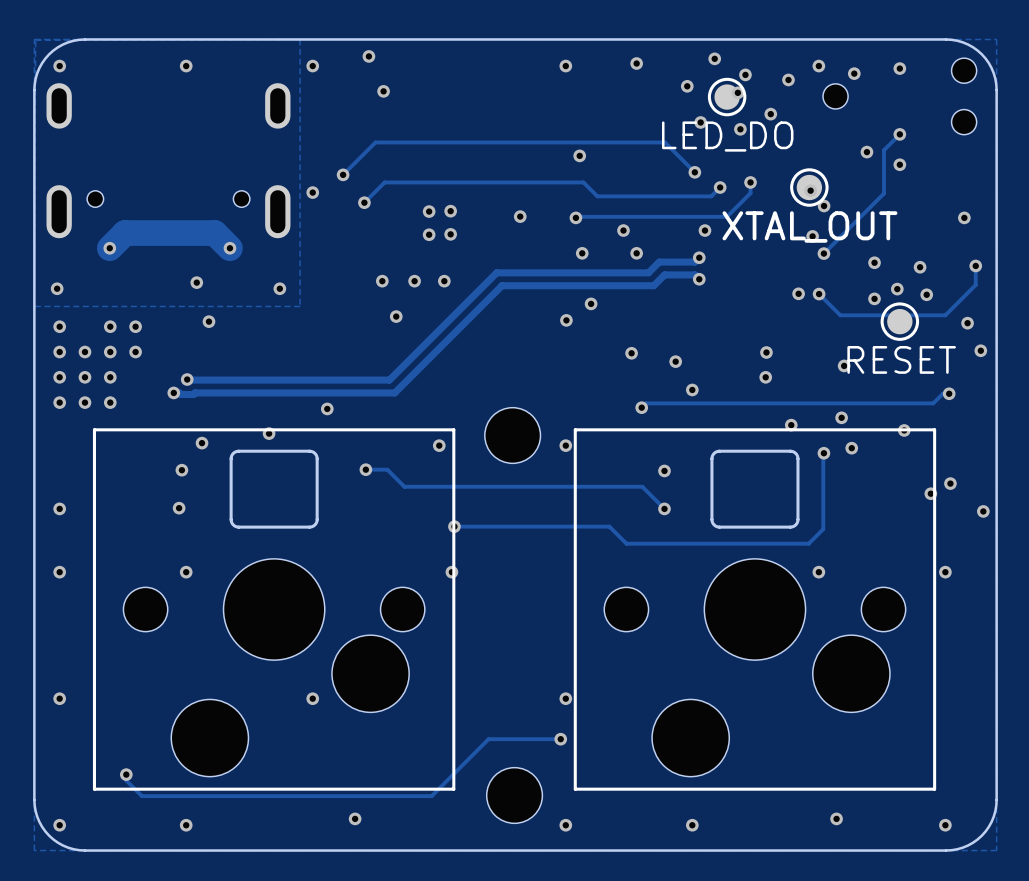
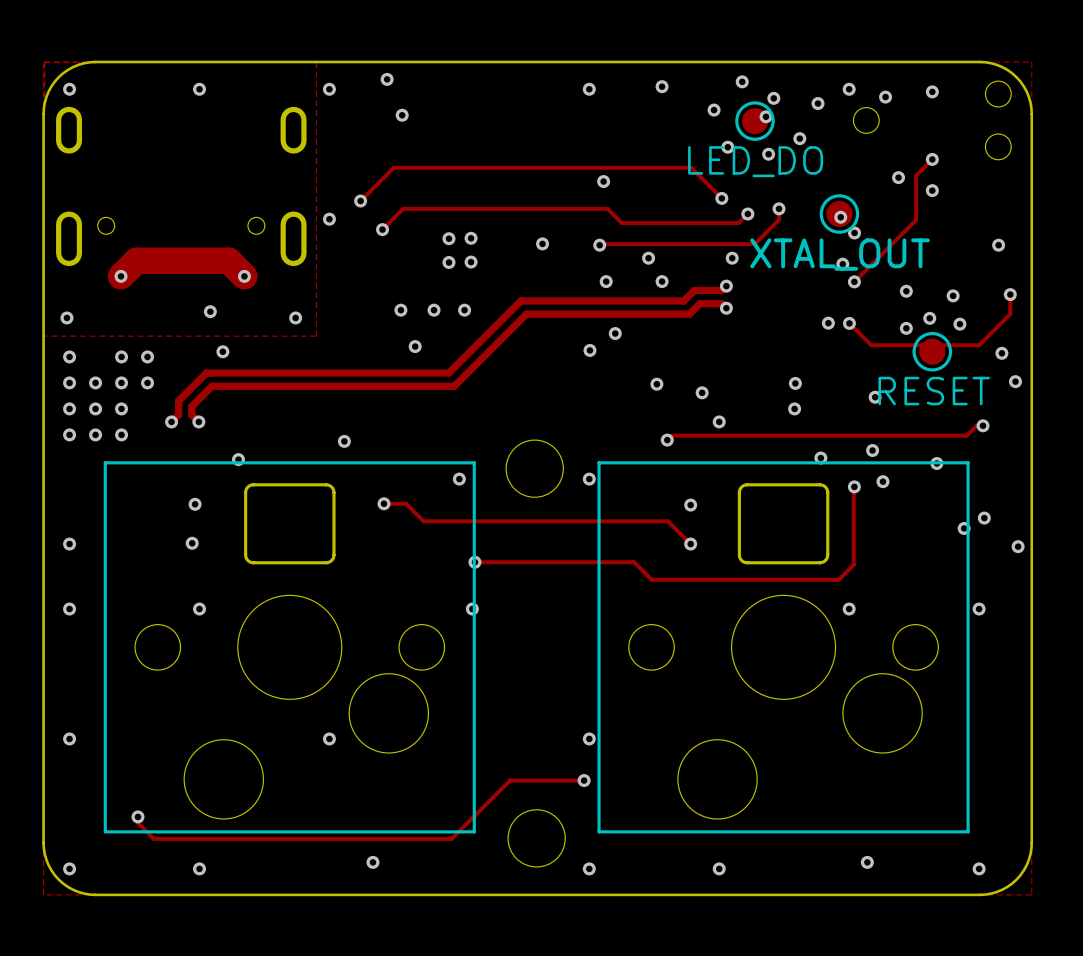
track: (668, 262) (659, 262) (648, 272) (496, 272) (389, 380) (187, 379) -> (694, 290) (683, 300) (520, 300) (448, 373) (206, 373) (178, 400) (178, 414) (171, 421)
track: (673, 274) (664, 274) (653, 285) (502, 285) (394, 392) (195, 392) (193, 394) (173, 392) (175, 394) -> (699, 303) (689, 314) (526, 314) (454, 386) (211, 386) (191, 406) (191, 414) (198, 421)
via: (187, 379) -> none
via: none -> (171, 421)
via: none -> (198, 421)
via: (173, 392) -> none
via: none -> (238, 459)
via: (269, 433) -> none
via: (202, 443) -> none

